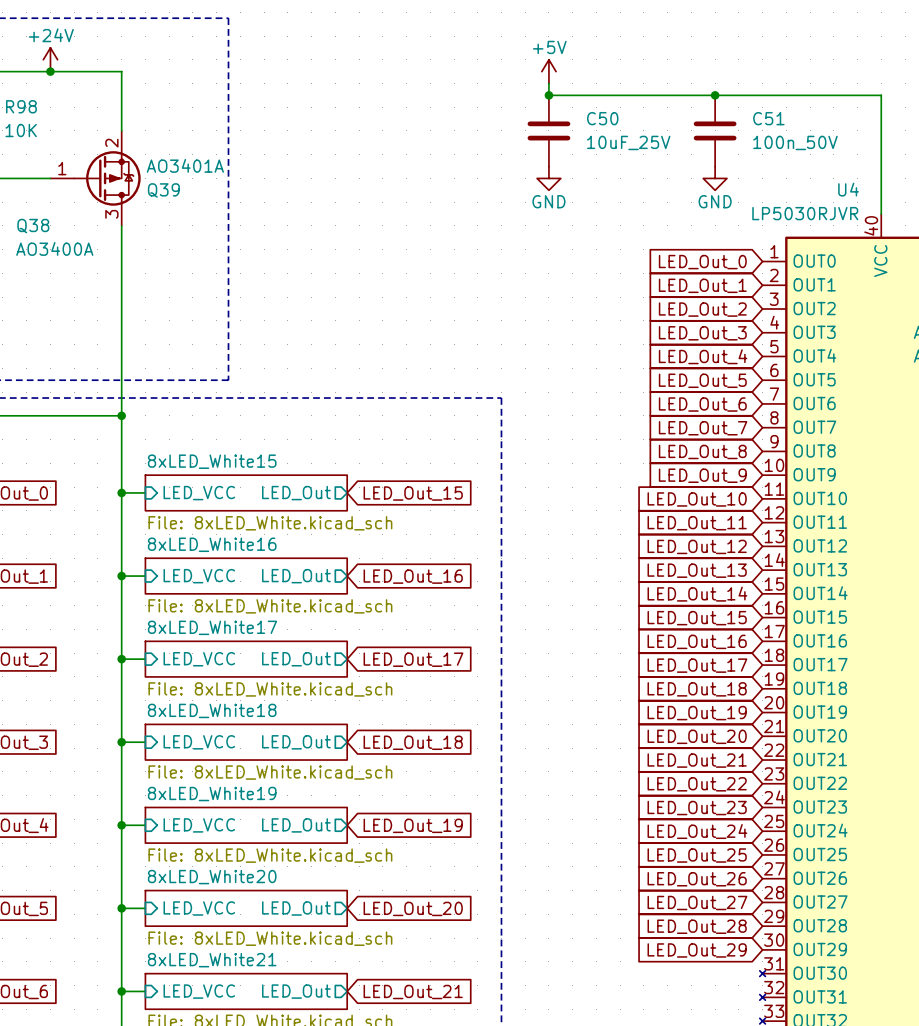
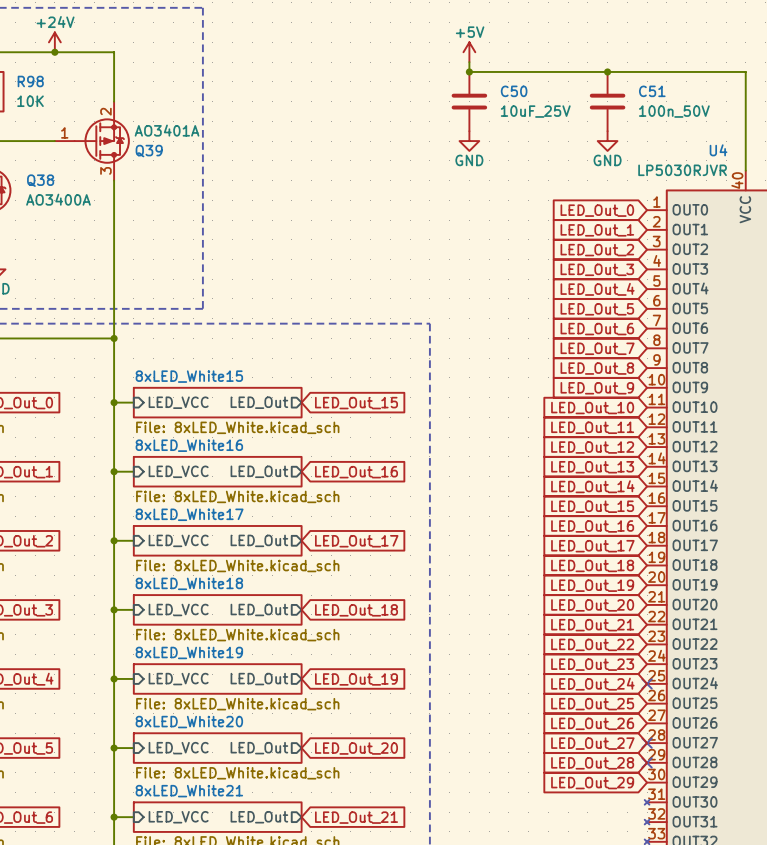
no-connect mark: none -> (647, 683)
no-connect mark: none -> (647, 743)
no-connect mark: none -> (647, 762)

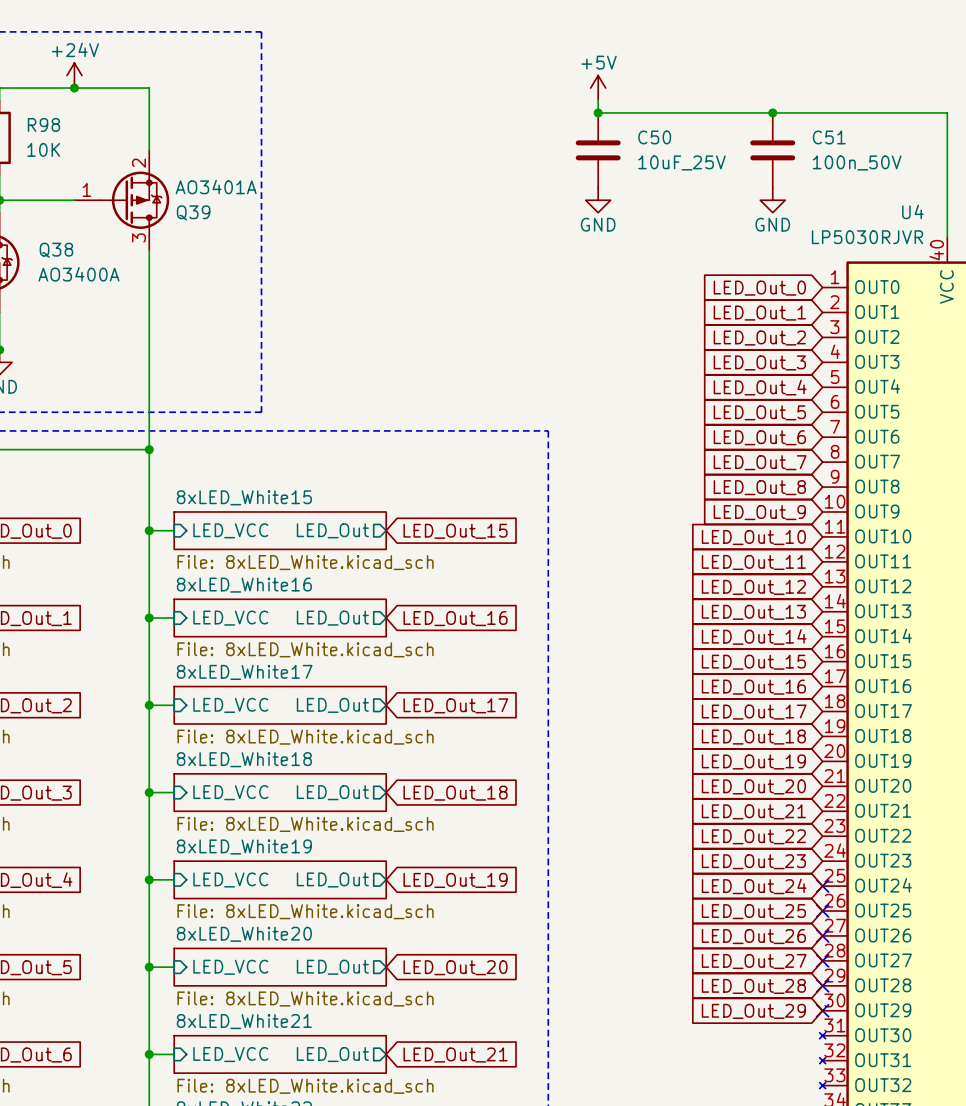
no-connect mark: none -> (822, 911)
no-connect mark: none -> (822, 935)
no-connect mark: none -> (822, 1010)

